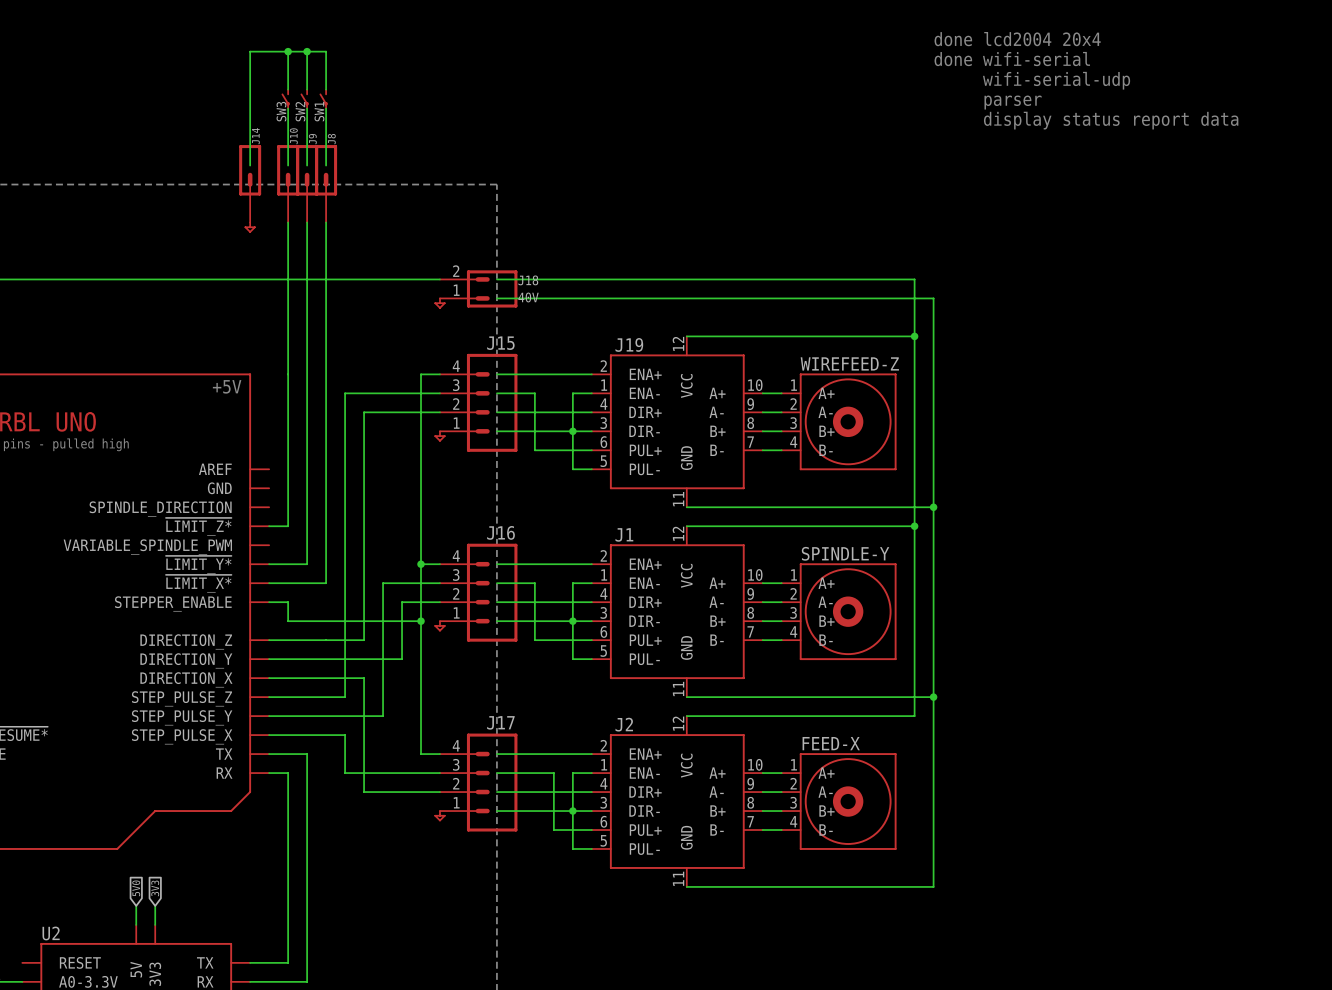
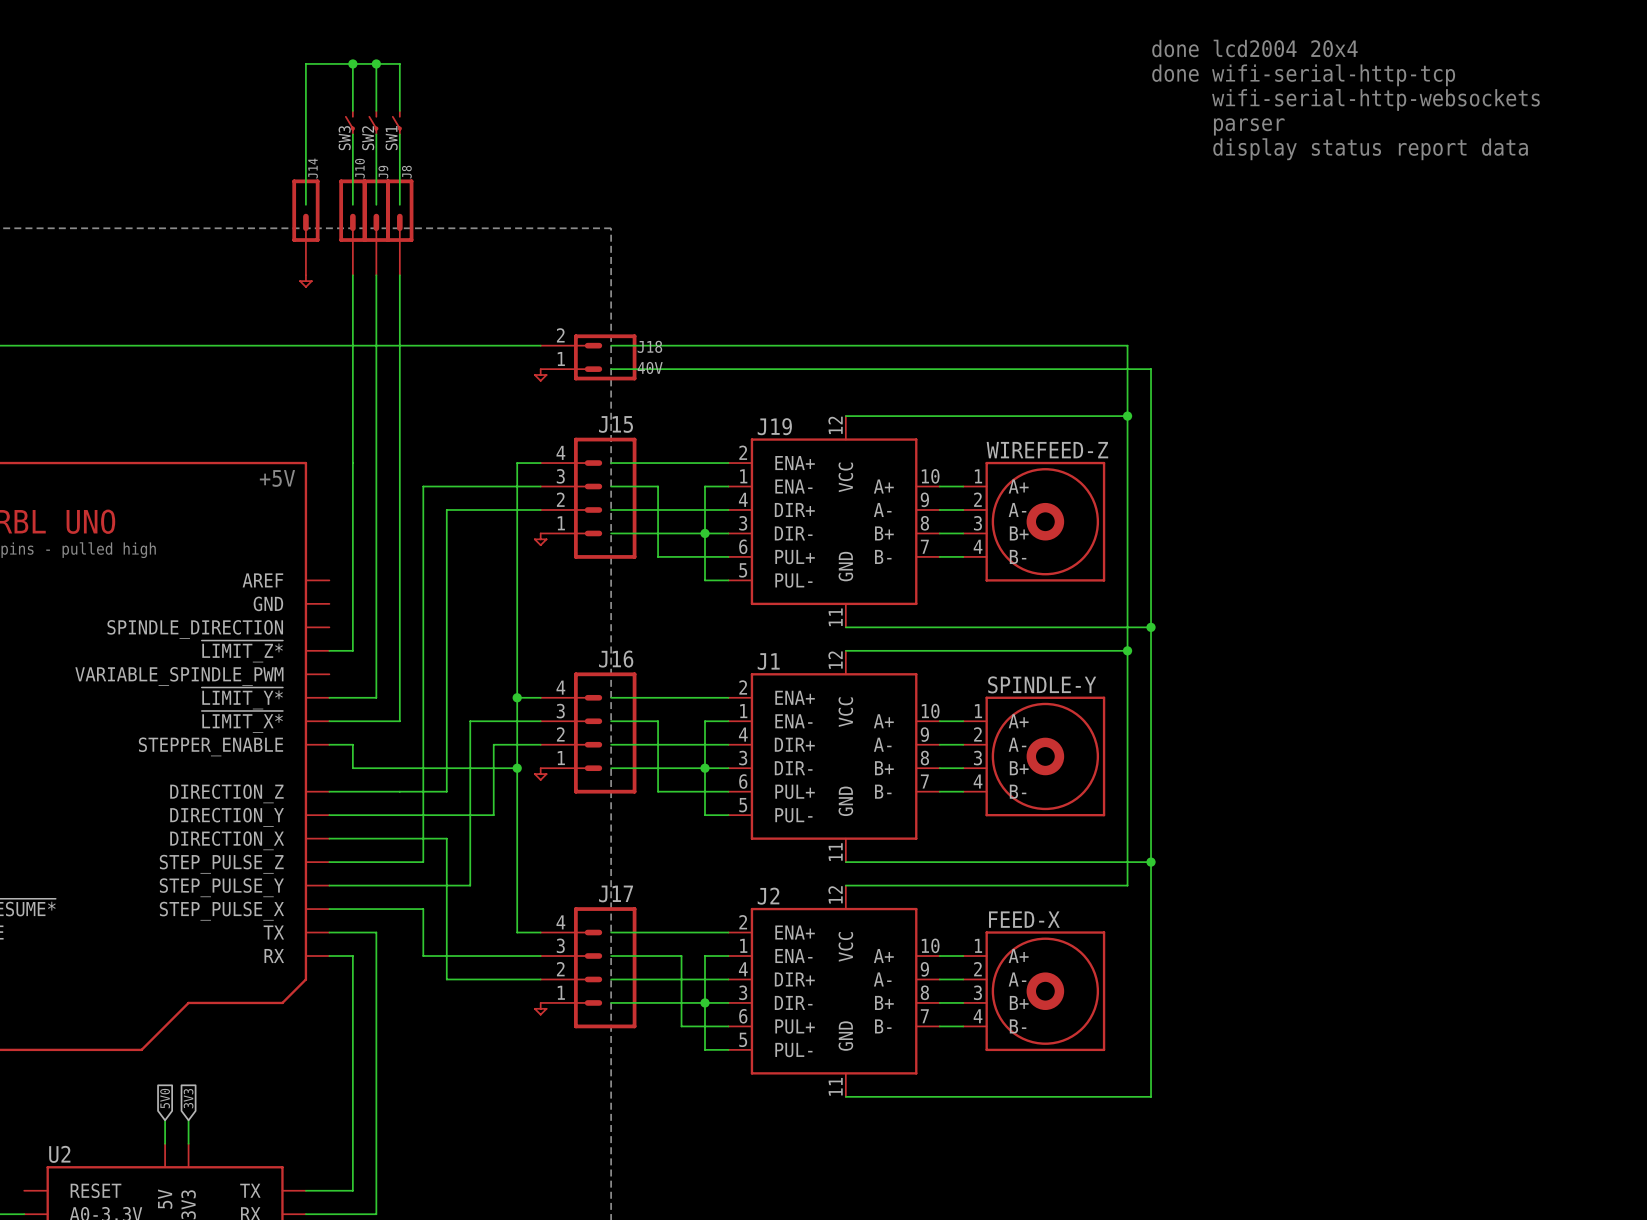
text: done wifi-serial (1012, 59) -> done wifi-serial-http-tcp (1303, 75)
text: wifi-serial-udp (1056, 80) -> wifi-serial-http-websockets (1375, 99)

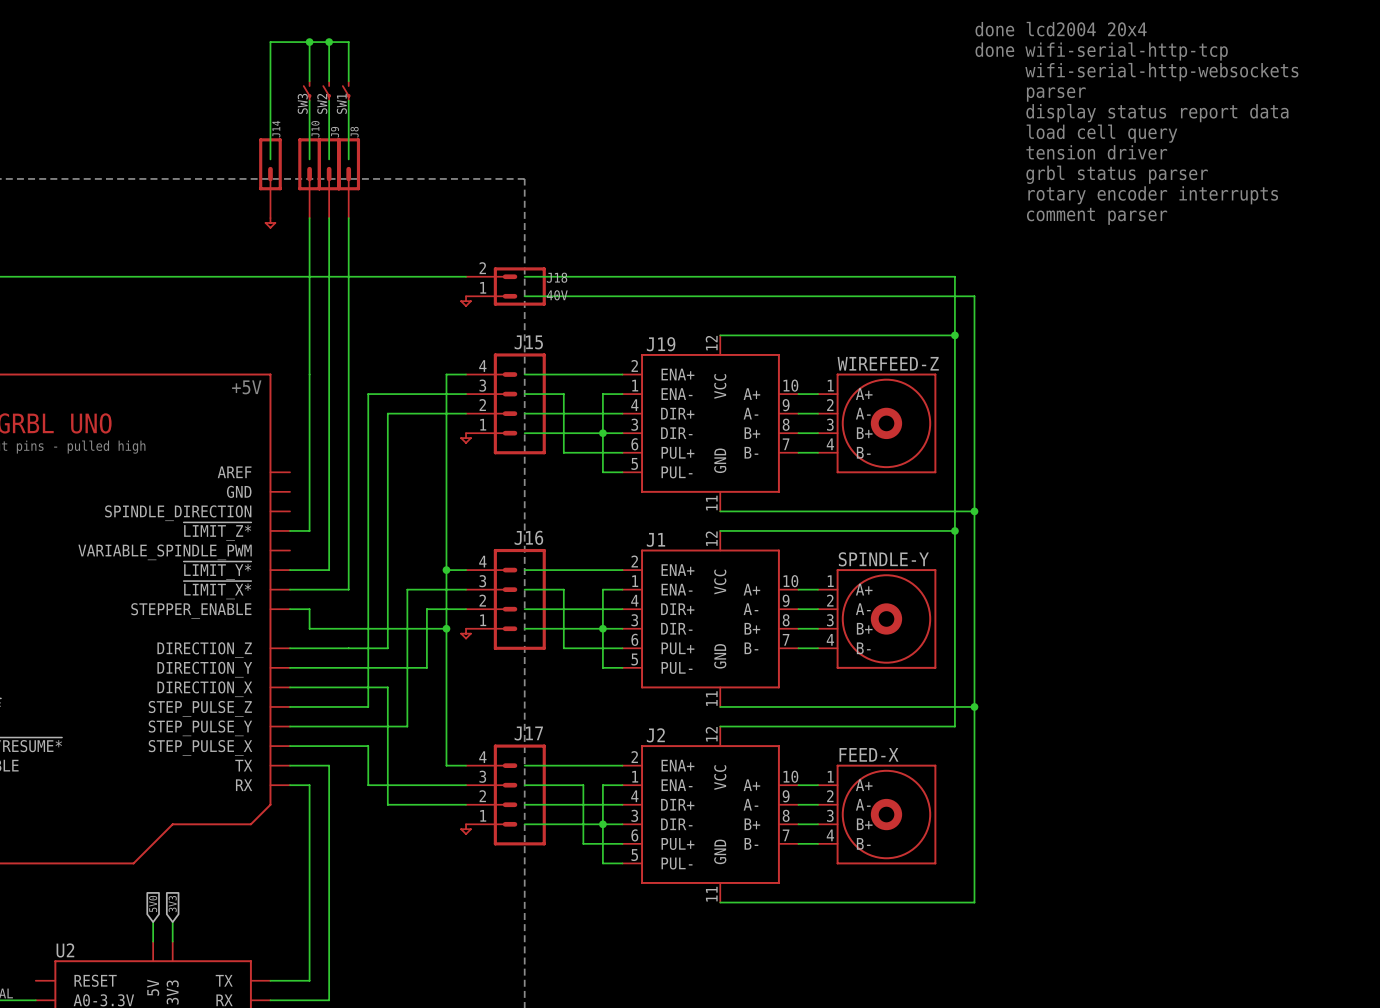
text: none -> load cell query (1101, 133)
text: none -> tension driver (1096, 152)
text: none -> grbl status parser (1117, 174)
text: none -> rotary encoder interrupts (1153, 195)
text: none -> comment parser (1097, 216)

